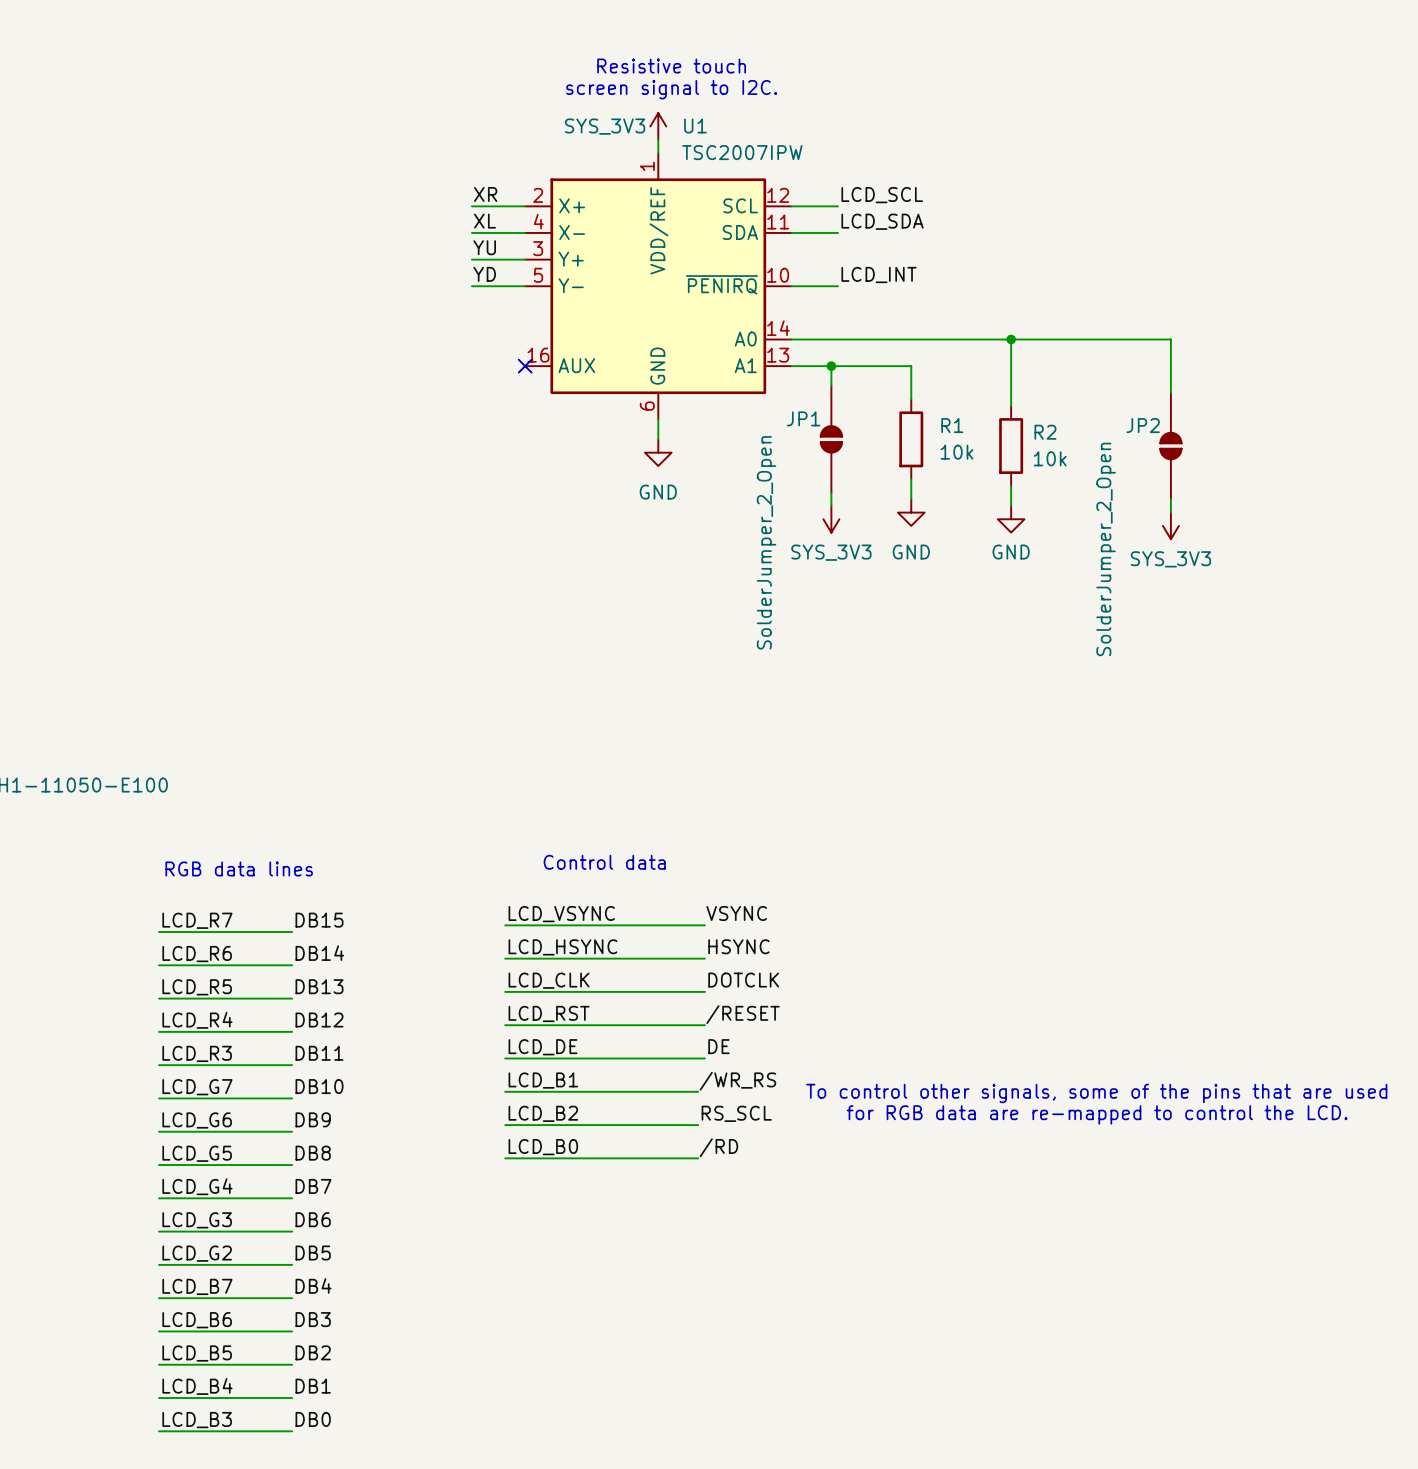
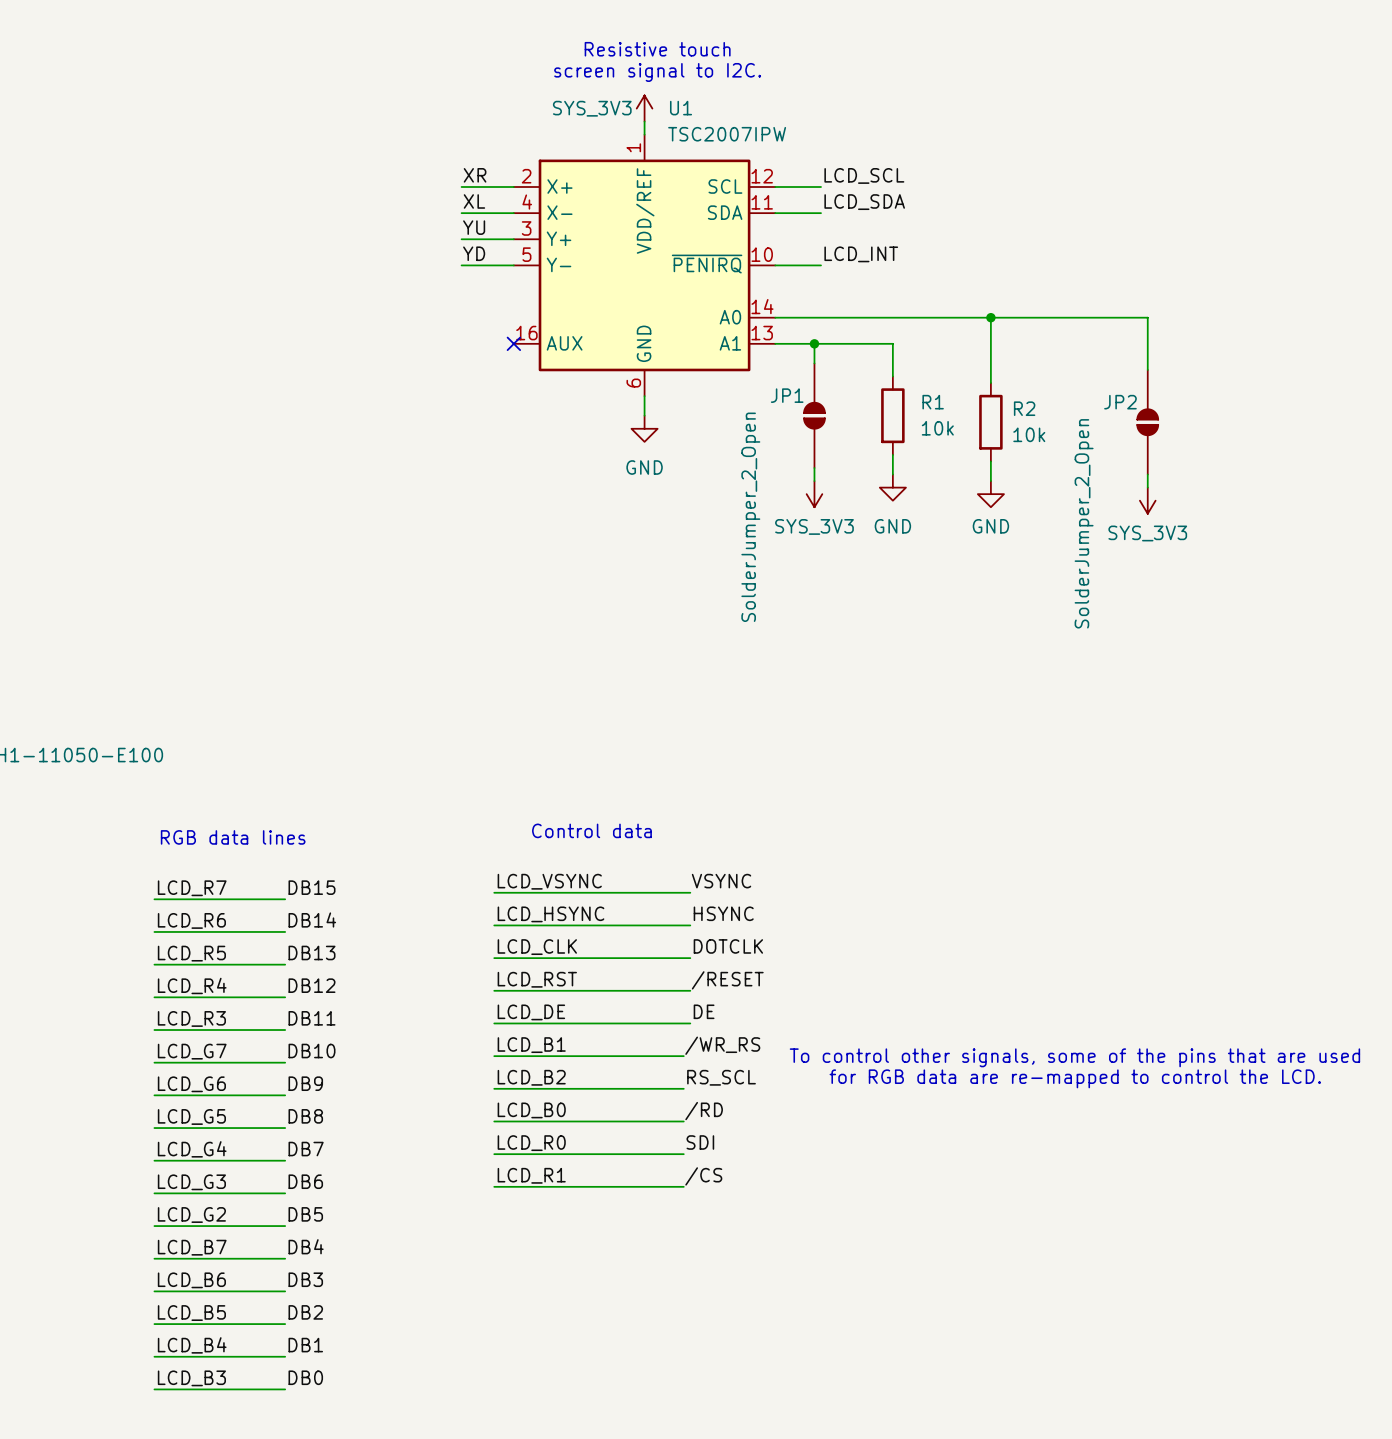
label: none -> SDI (700, 1142)
label: none -> LCD_R0 (531, 1143)
wire: none -> (494, 1154) (683, 1154)
label: none -> LCD_R1 (531, 1175)
label: none -> /CS (703, 1176)
wire: none -> (494, 1186) (683, 1186)

